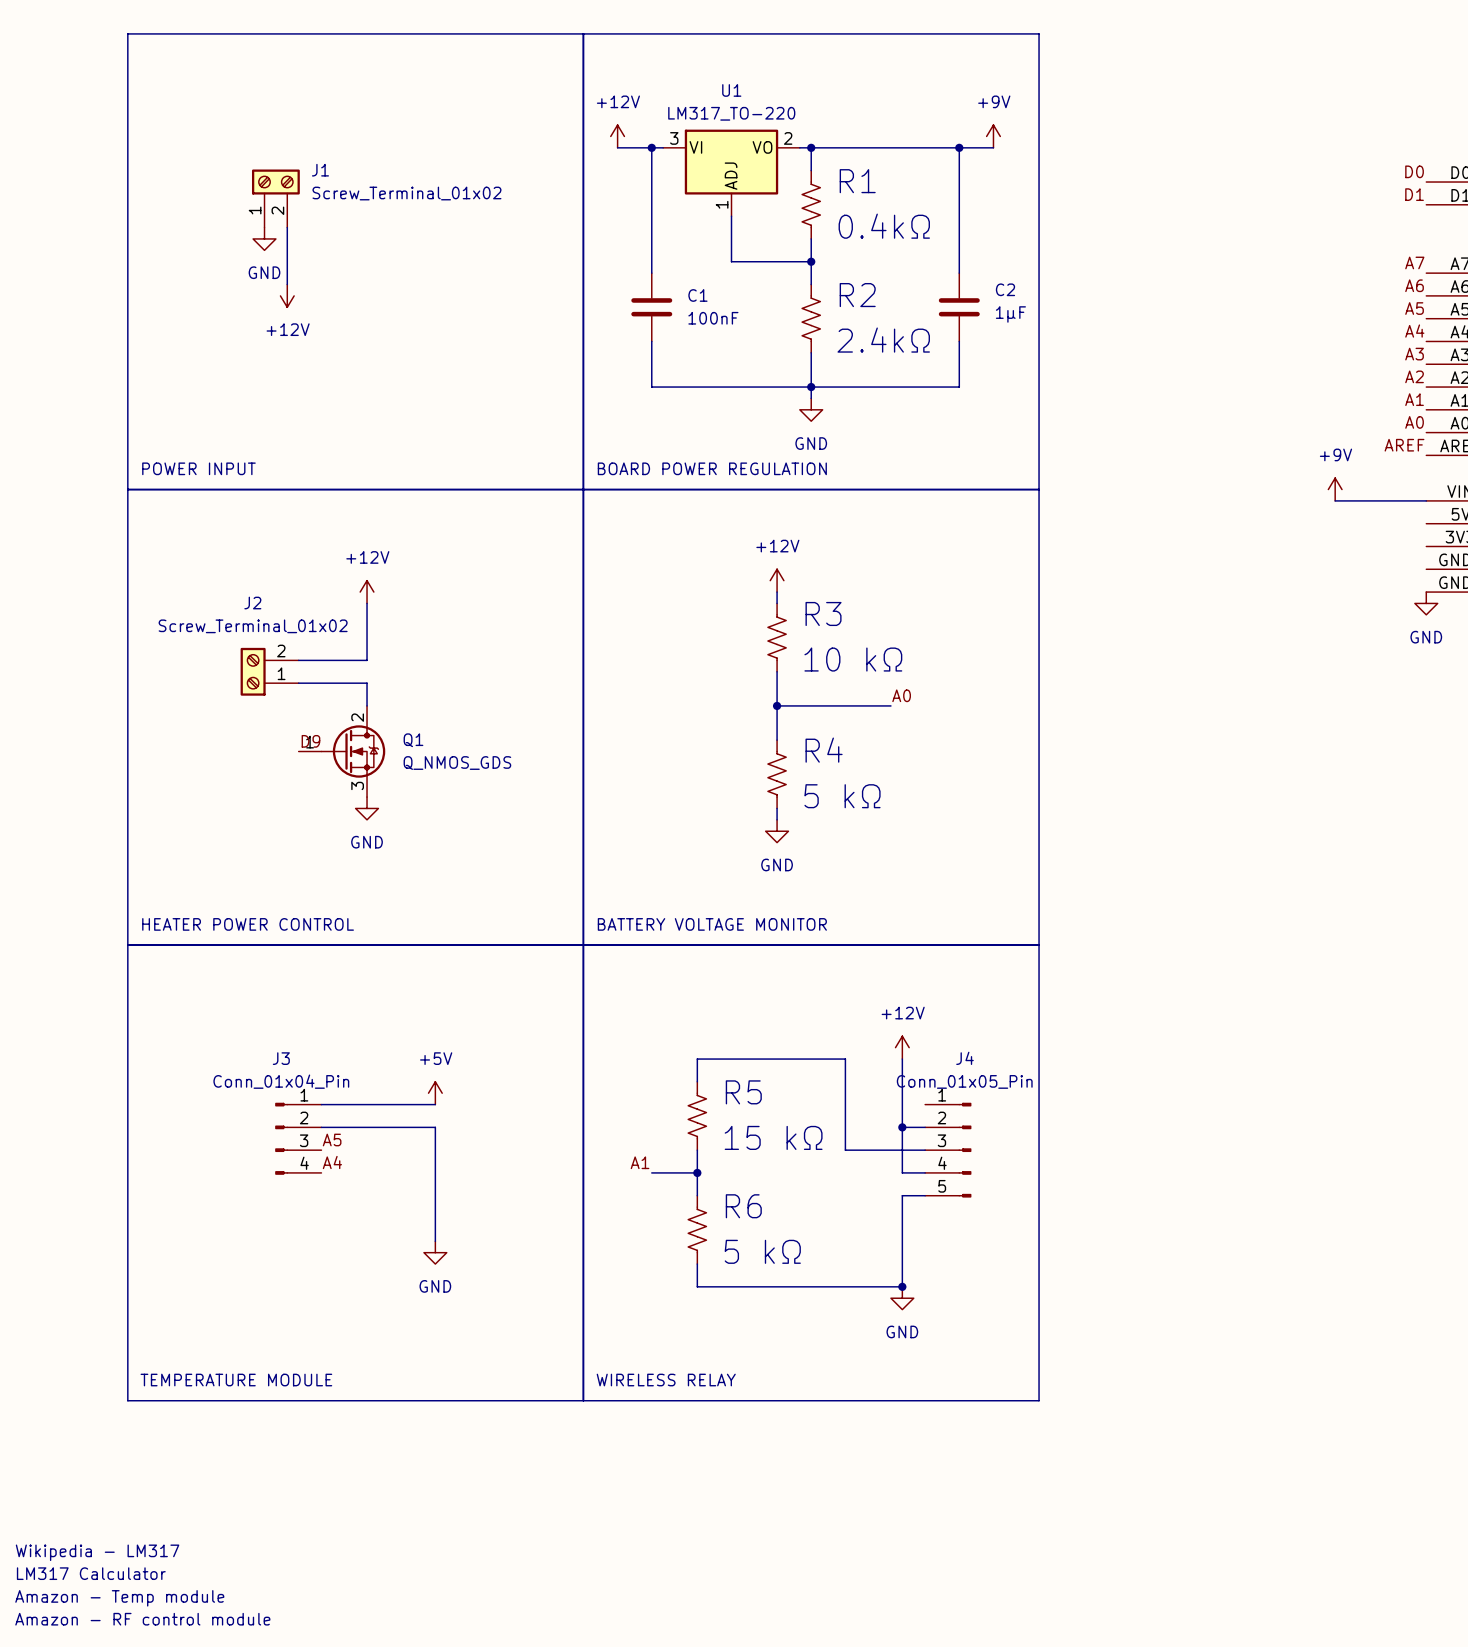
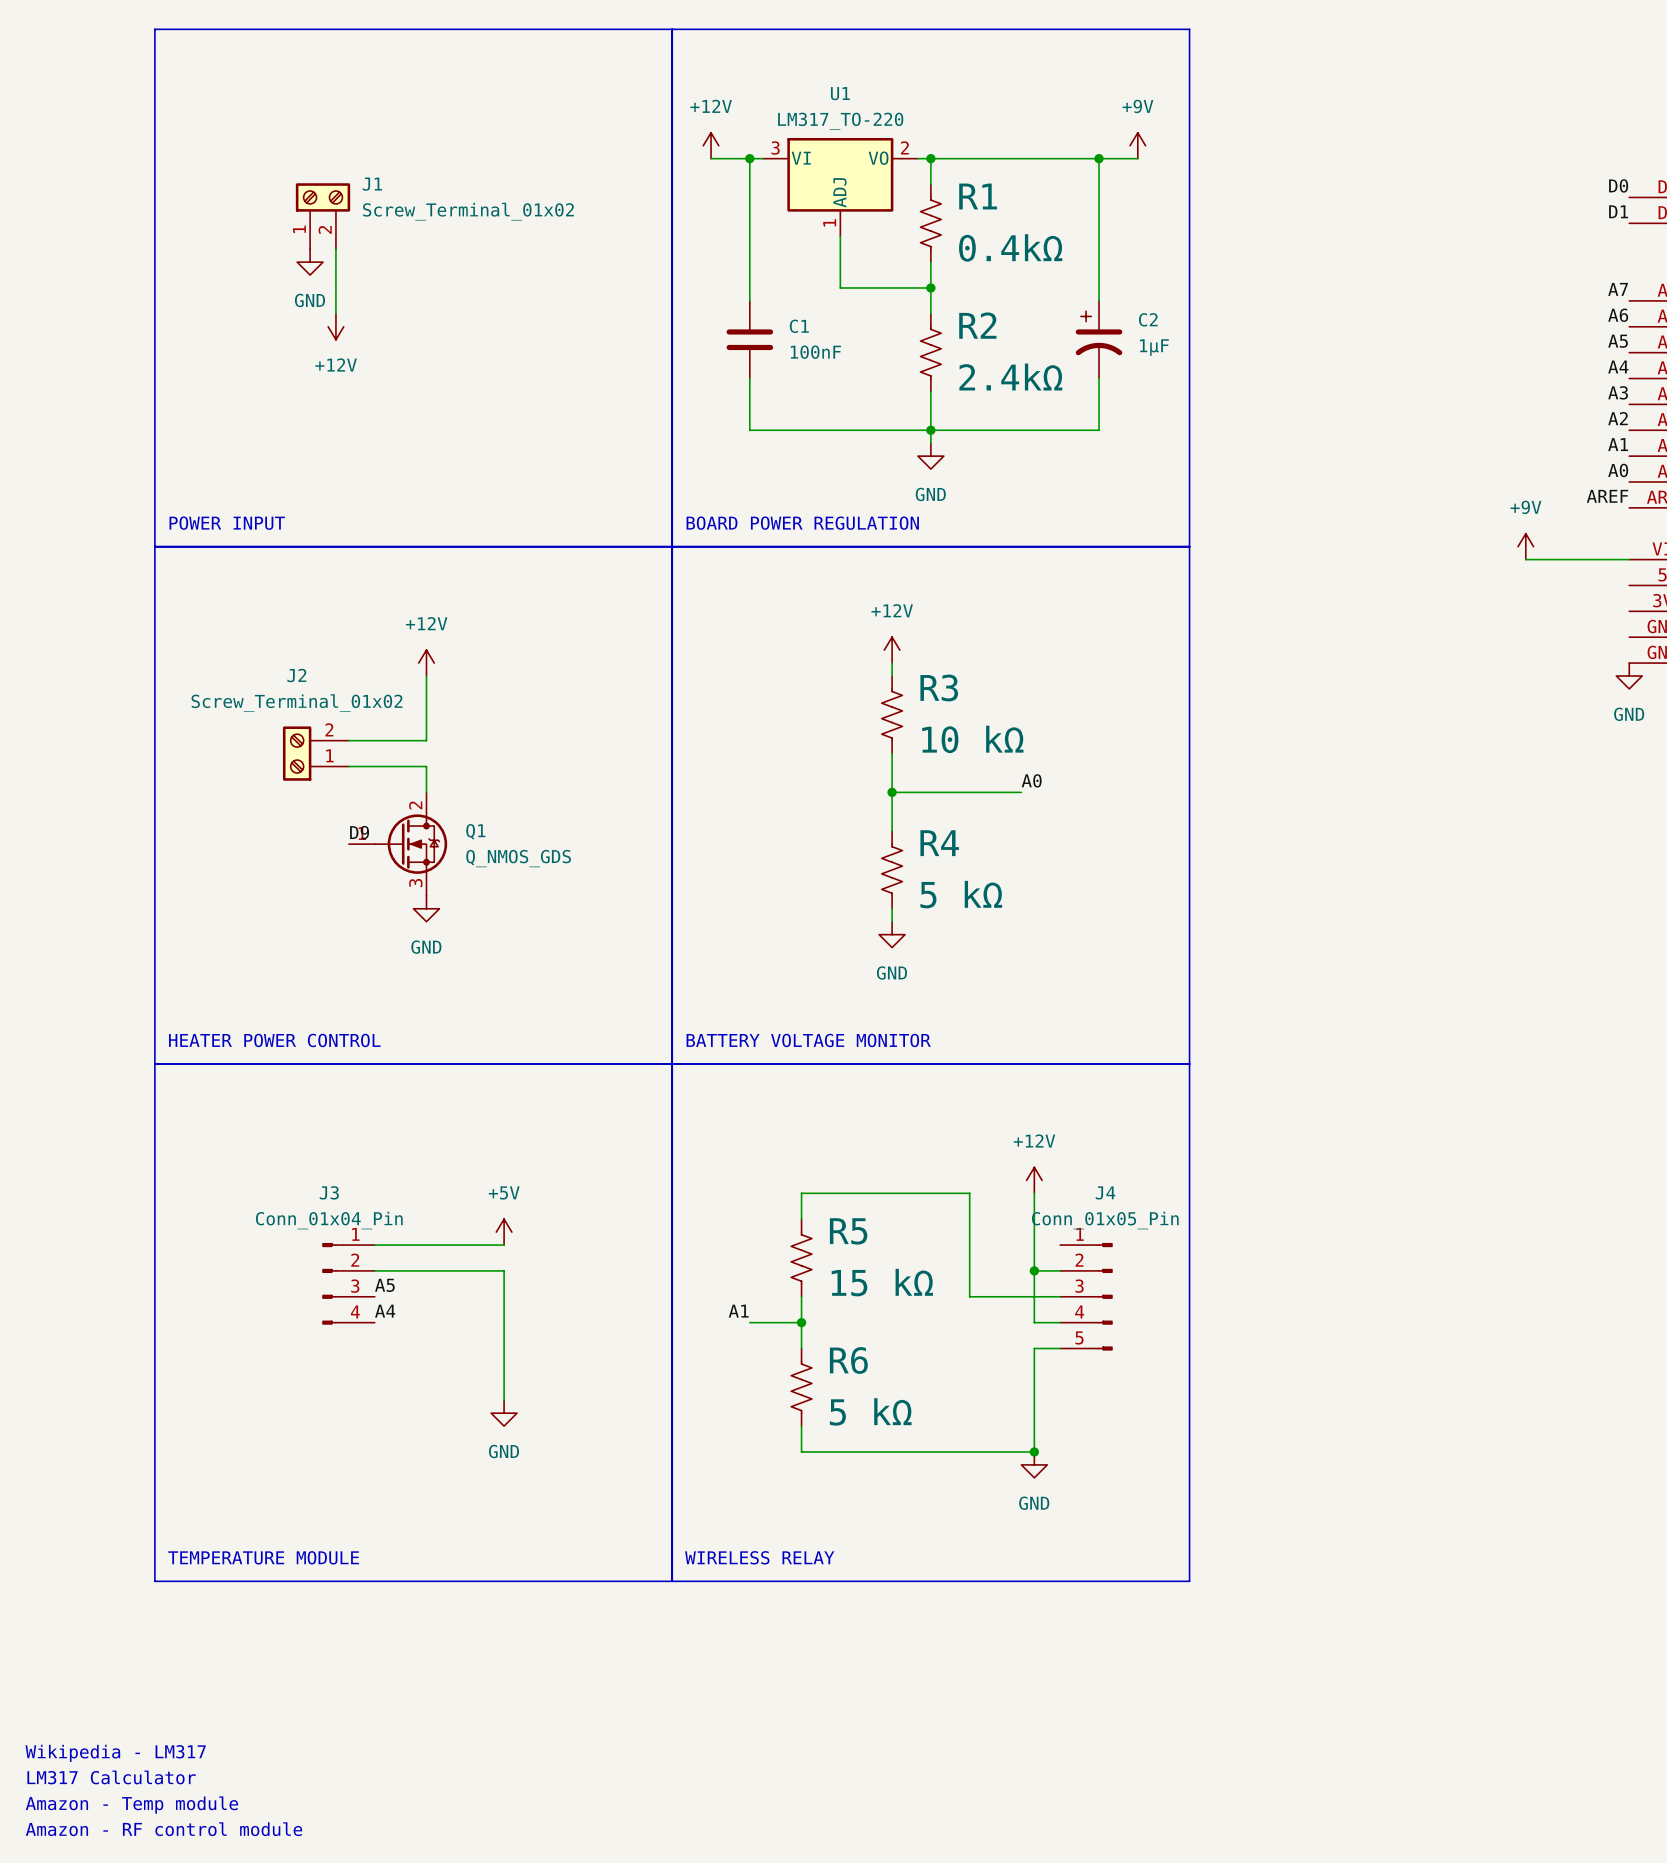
C2 symbol: [938, 273, 980, 342] -> [1075, 300, 1123, 379]

